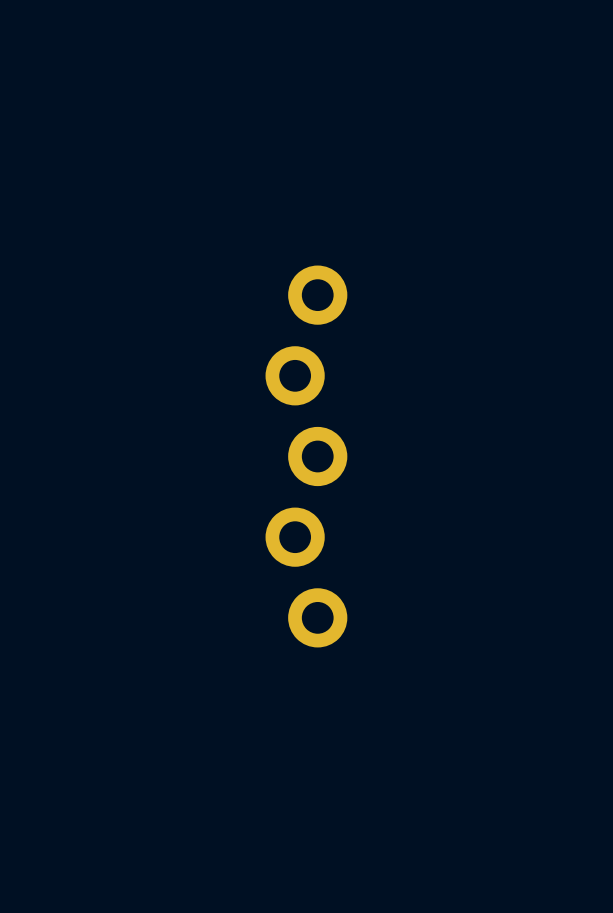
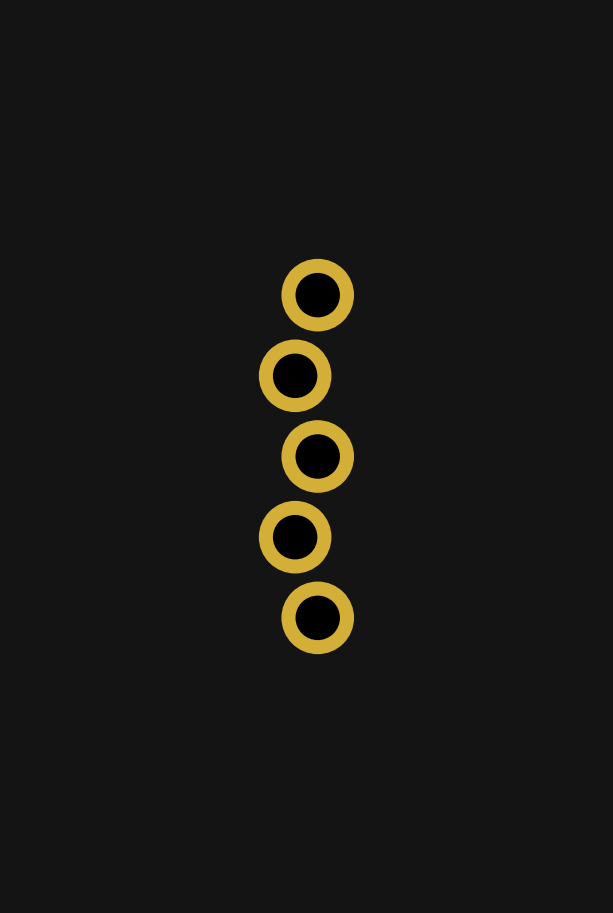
part footprint: [265, 265, 348, 648] -> [258, 258, 355, 655]

